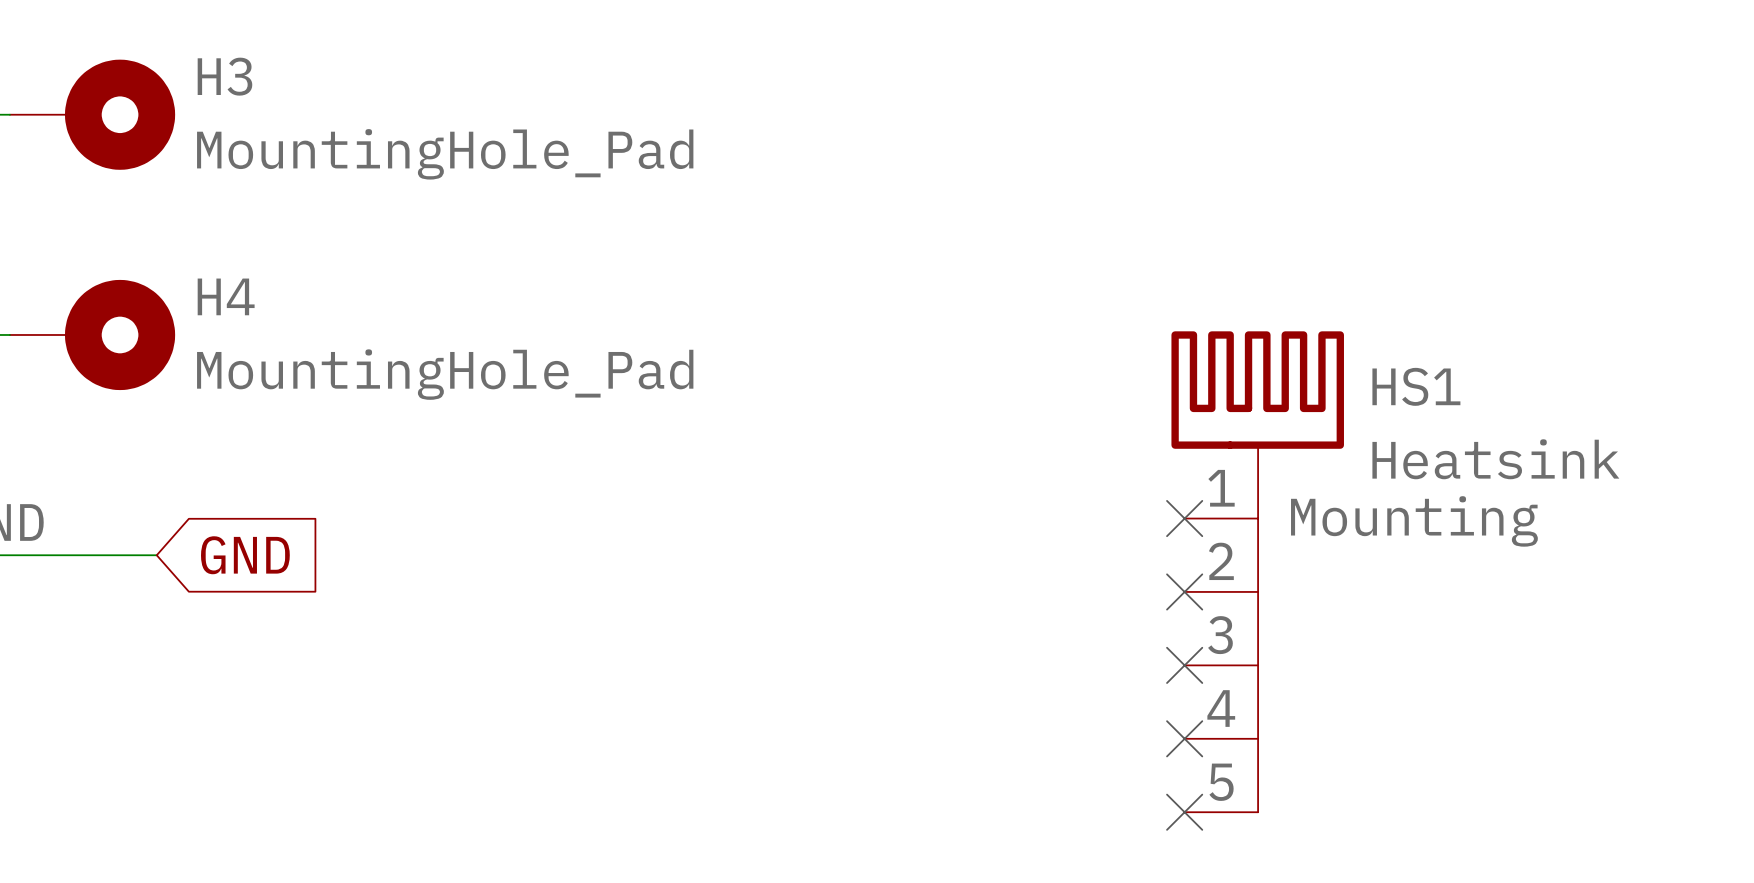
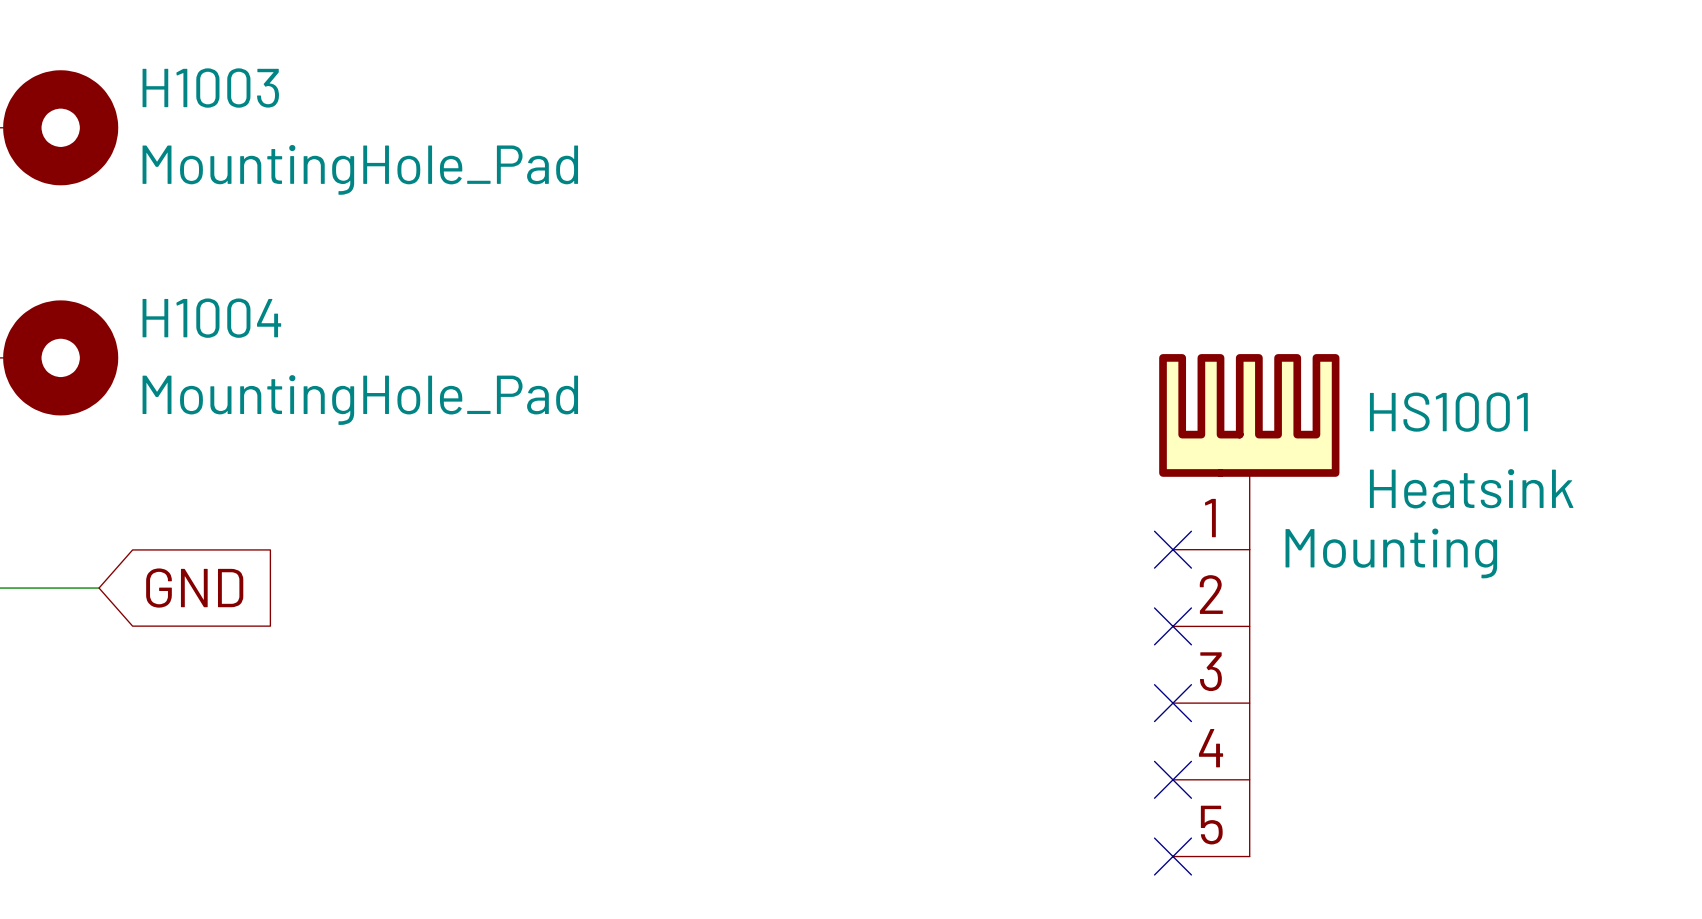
H3 name: H3 (224, 76) -> H1003 (210, 88)
H4 name: H4 (226, 296) -> H1004 (211, 318)
HS1 name: HS1 (1416, 386) -> HS1001 (1448, 412)

